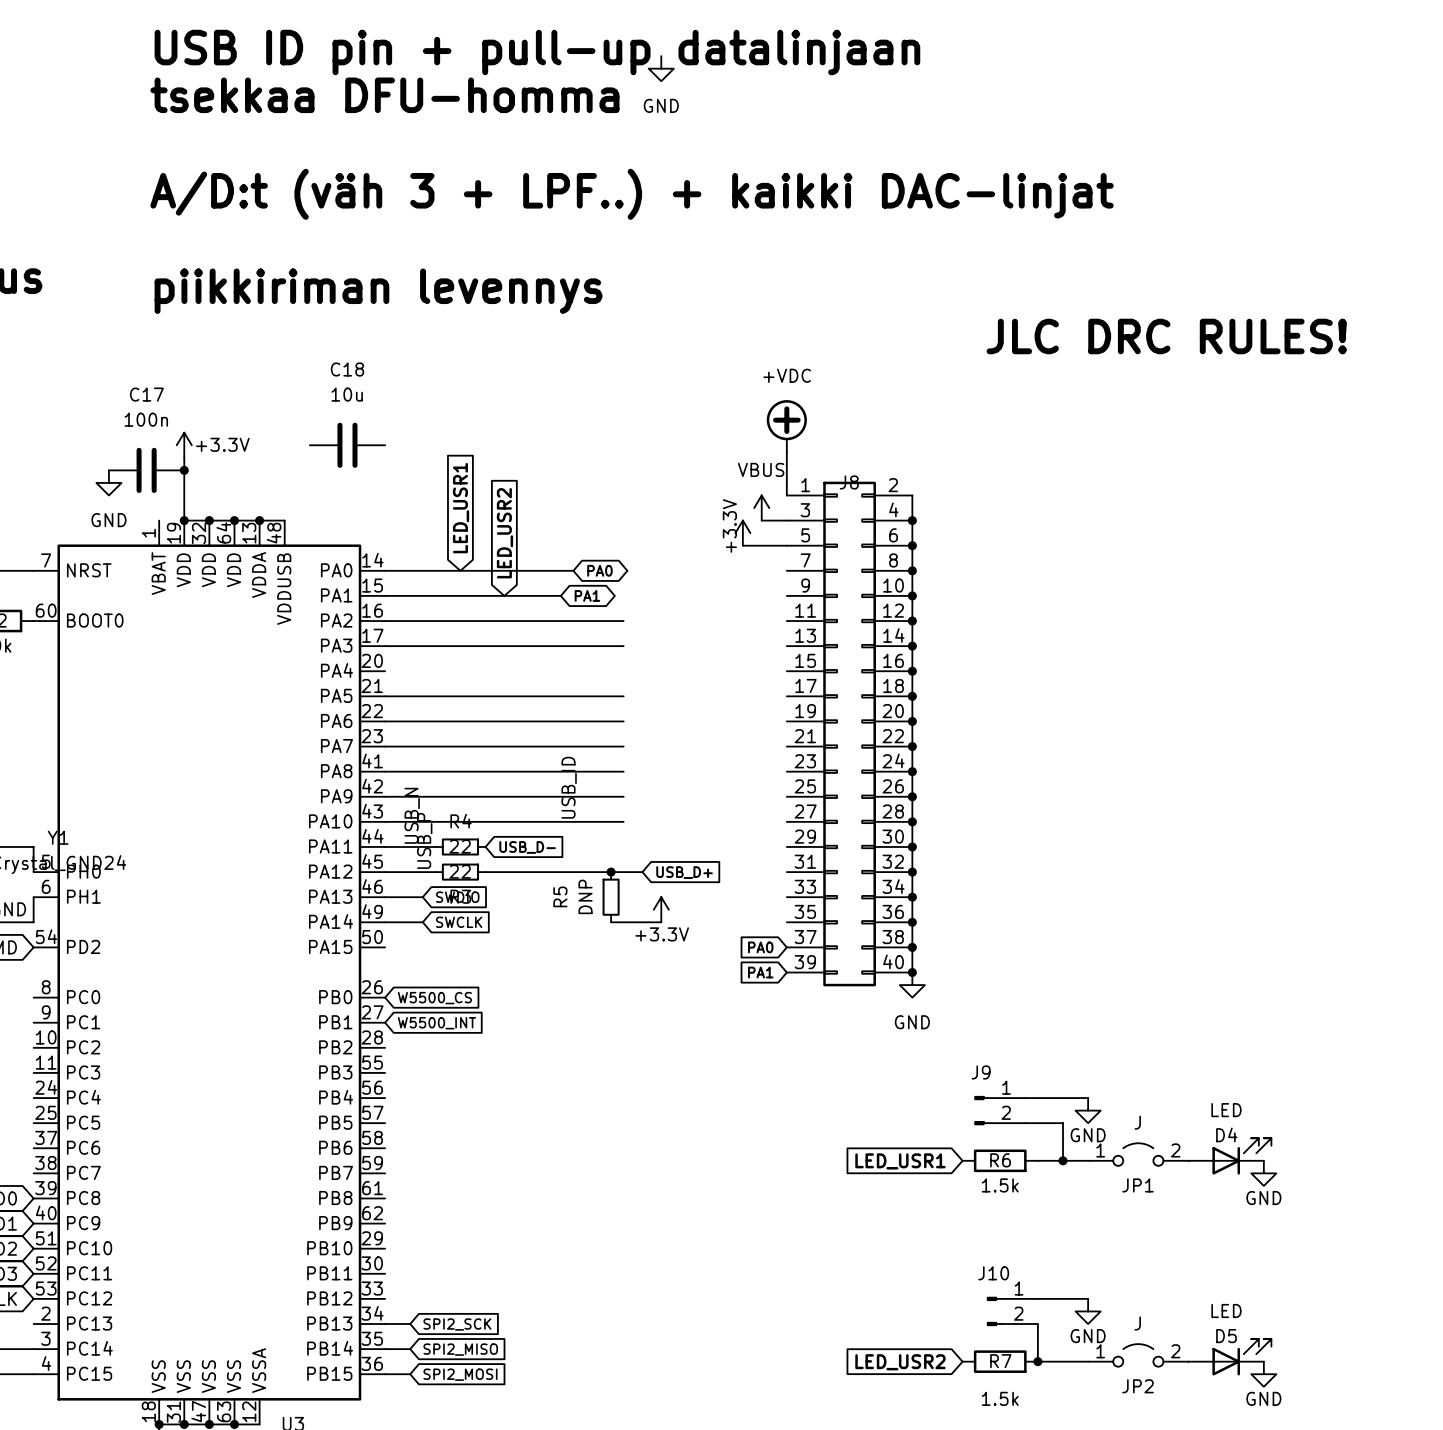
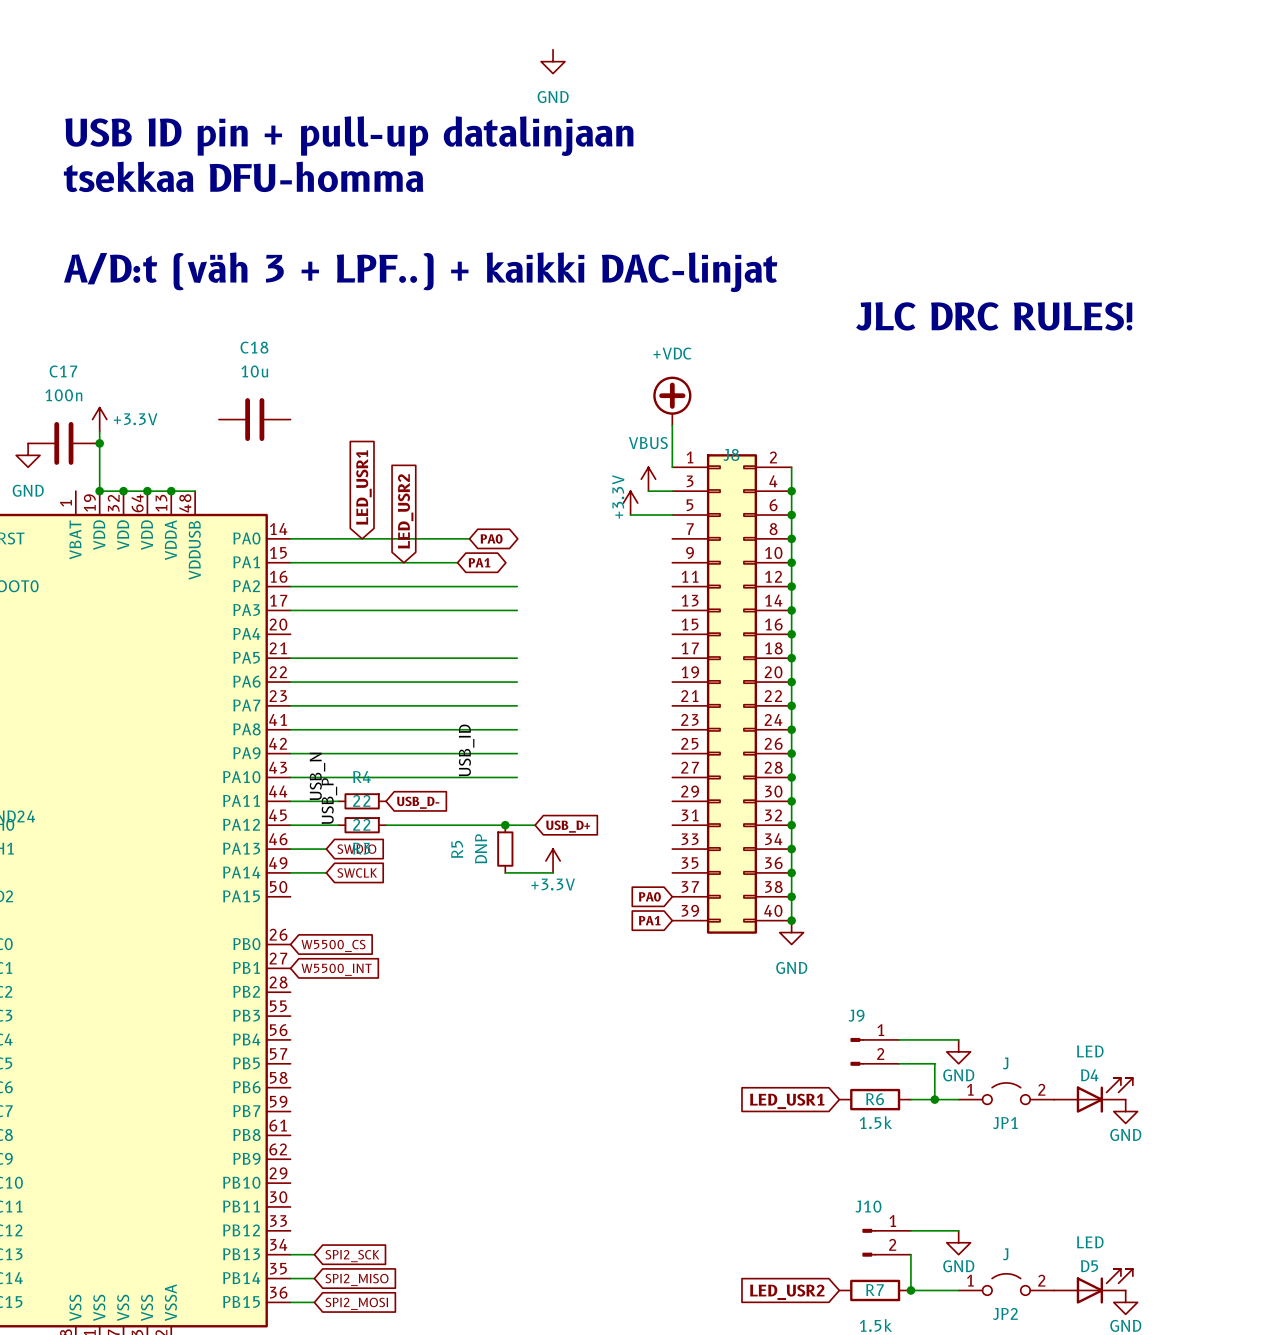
text position: USB ID pin + pull-up datalinjaan (537, 52) -> USB ID pin + pull-up datalinjaan (349, 136)
text: tsekkaa DFU-homma (384, 95) -> none
text: A/D:t (väh 3 + LPF..) + kaikki DAC-linjat (632, 194) -> tsekkaa DFU-homma (243, 176)
text: piikkiriman levennys (378, 291) -> A/D:t (väh 3 + LPF..) + kaikki DAC-linjat (420, 272)

